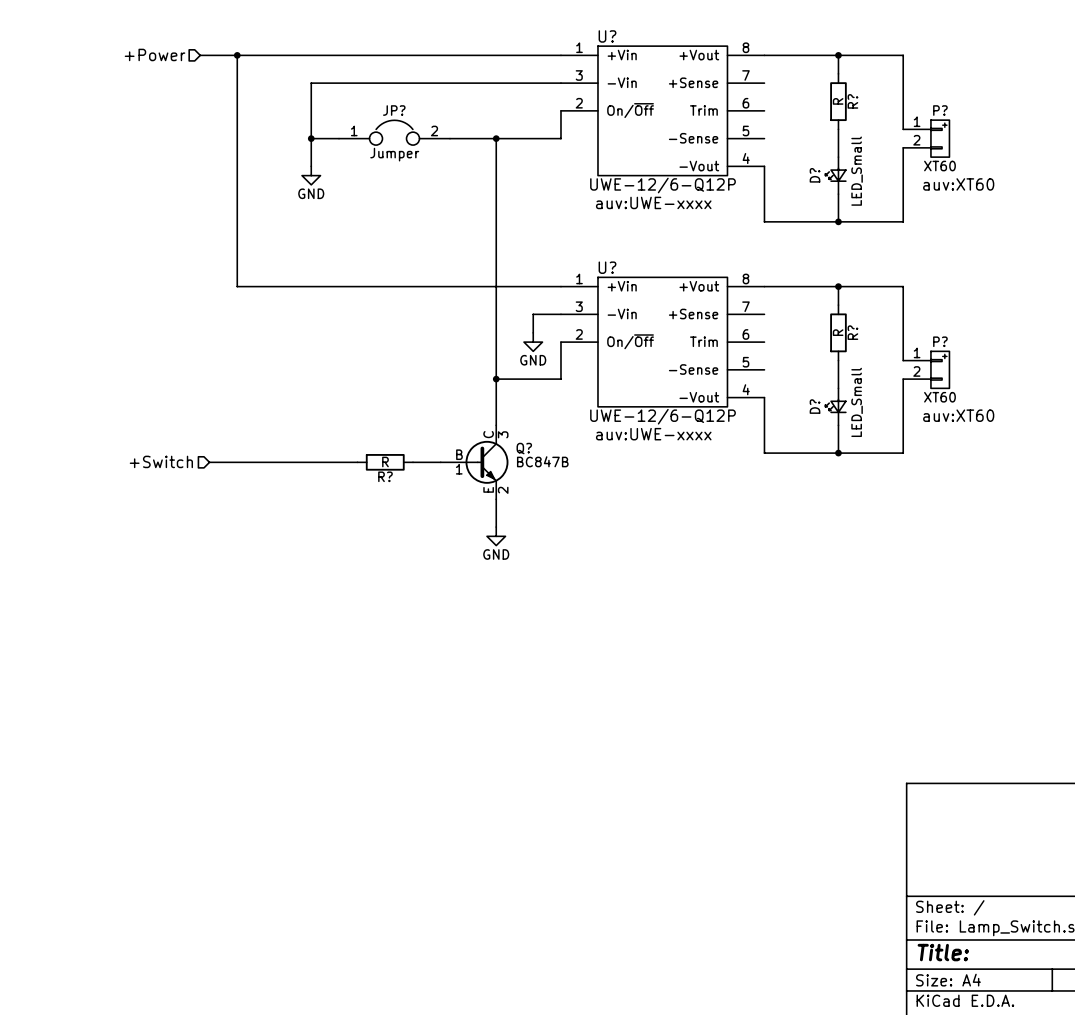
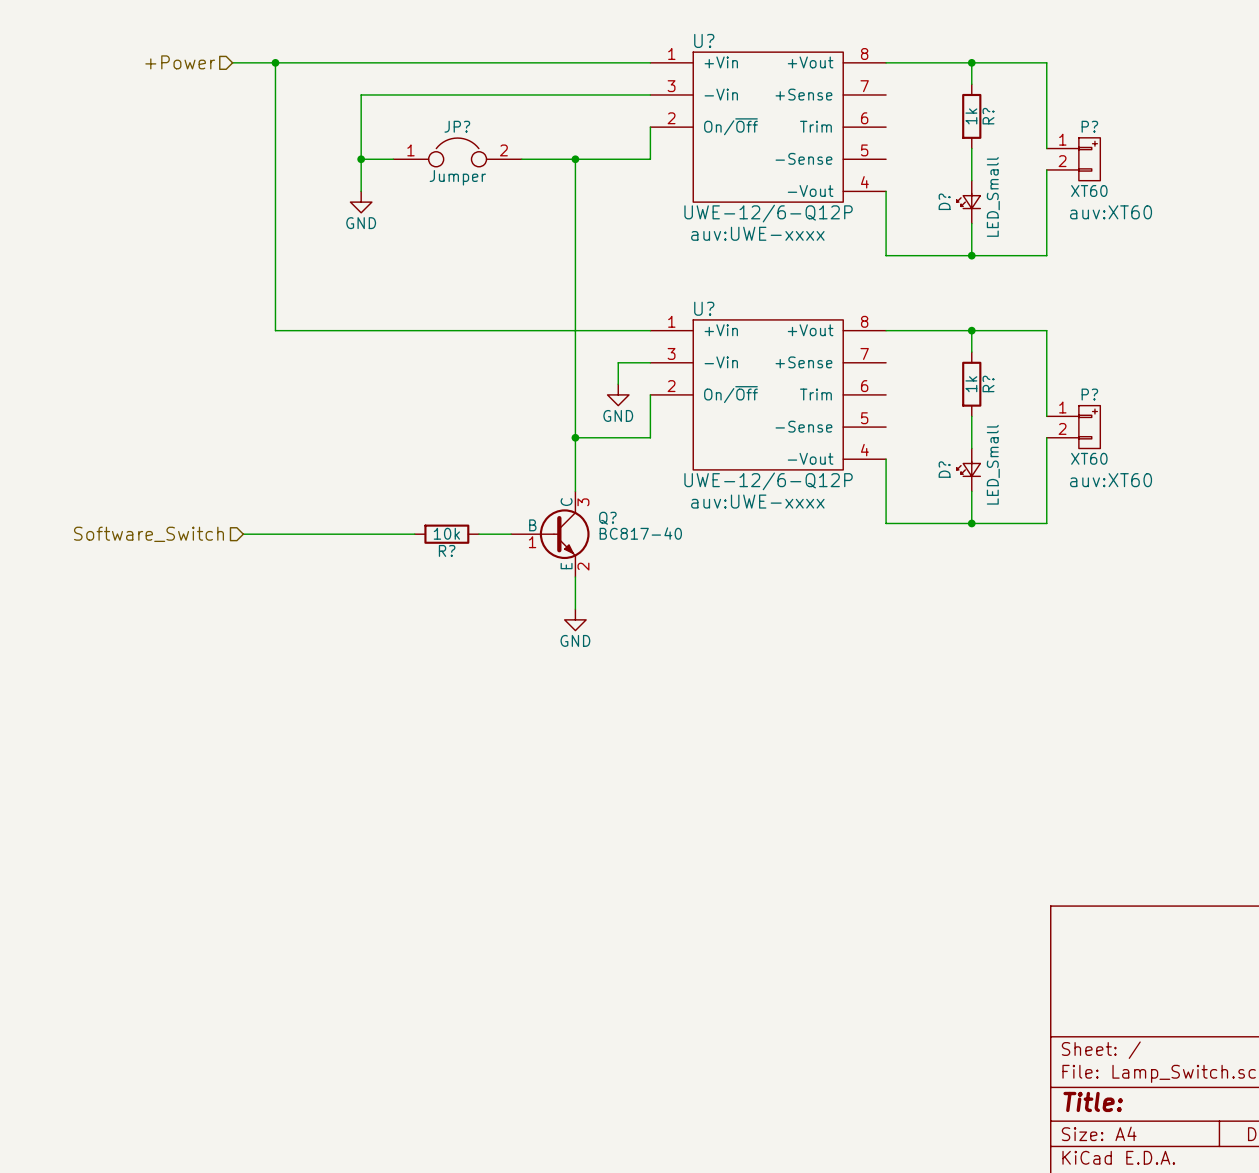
R? value: R (838, 101) -> 1k (971, 116)
R? value: R (838, 332) -> 1k (971, 384)
hierarchical label: +Switch (161, 461) -> Software_Switch (148, 534)
R? value: R (385, 461) -> 10k (446, 533)
Q? value: BC847B (542, 461) -> BC817-40 (640, 533)

